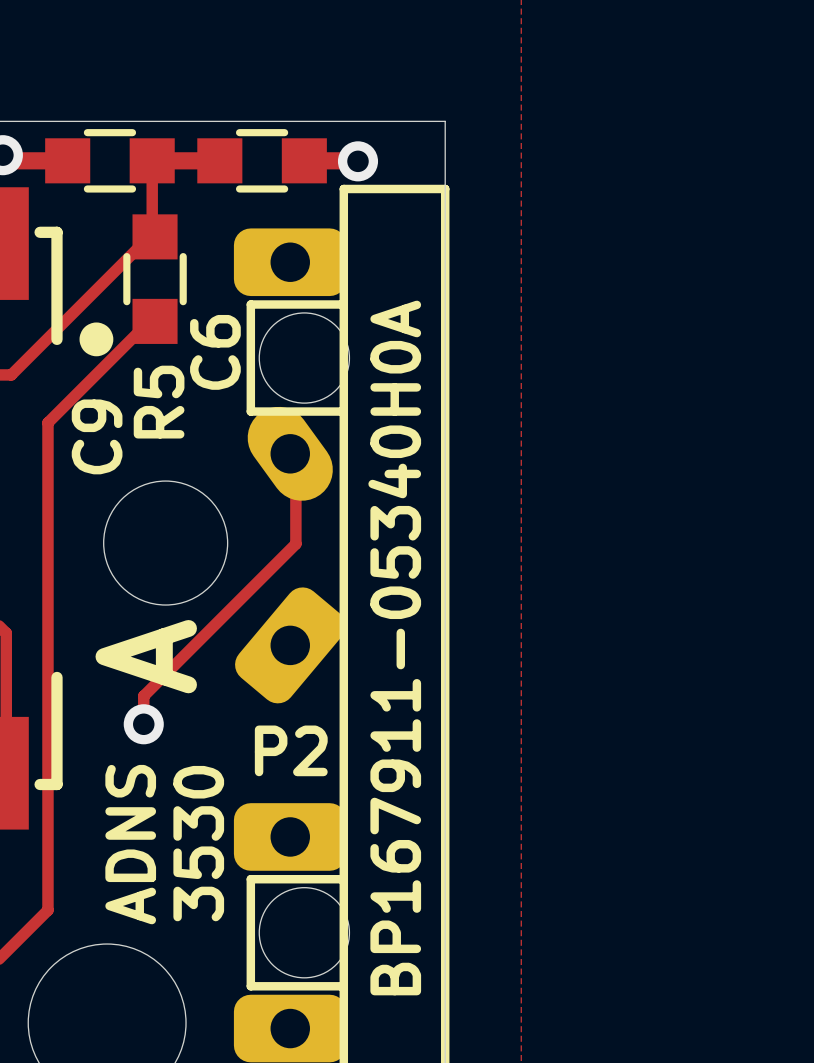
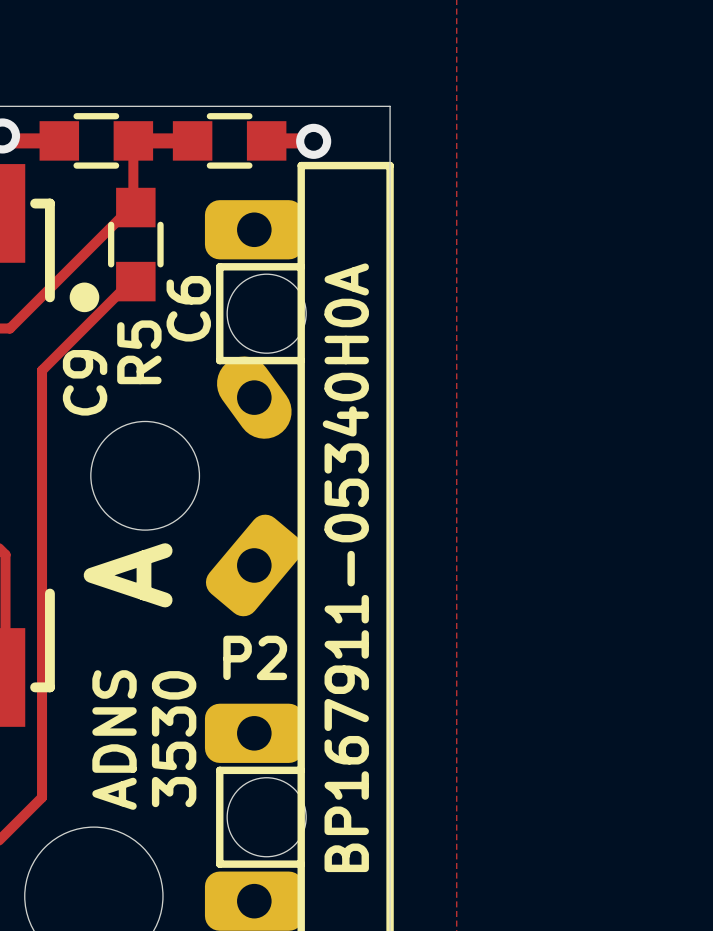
track: (295, 465) (295, 543) (143, 696) (143, 724) -> none
via: (143, 724) -> none

